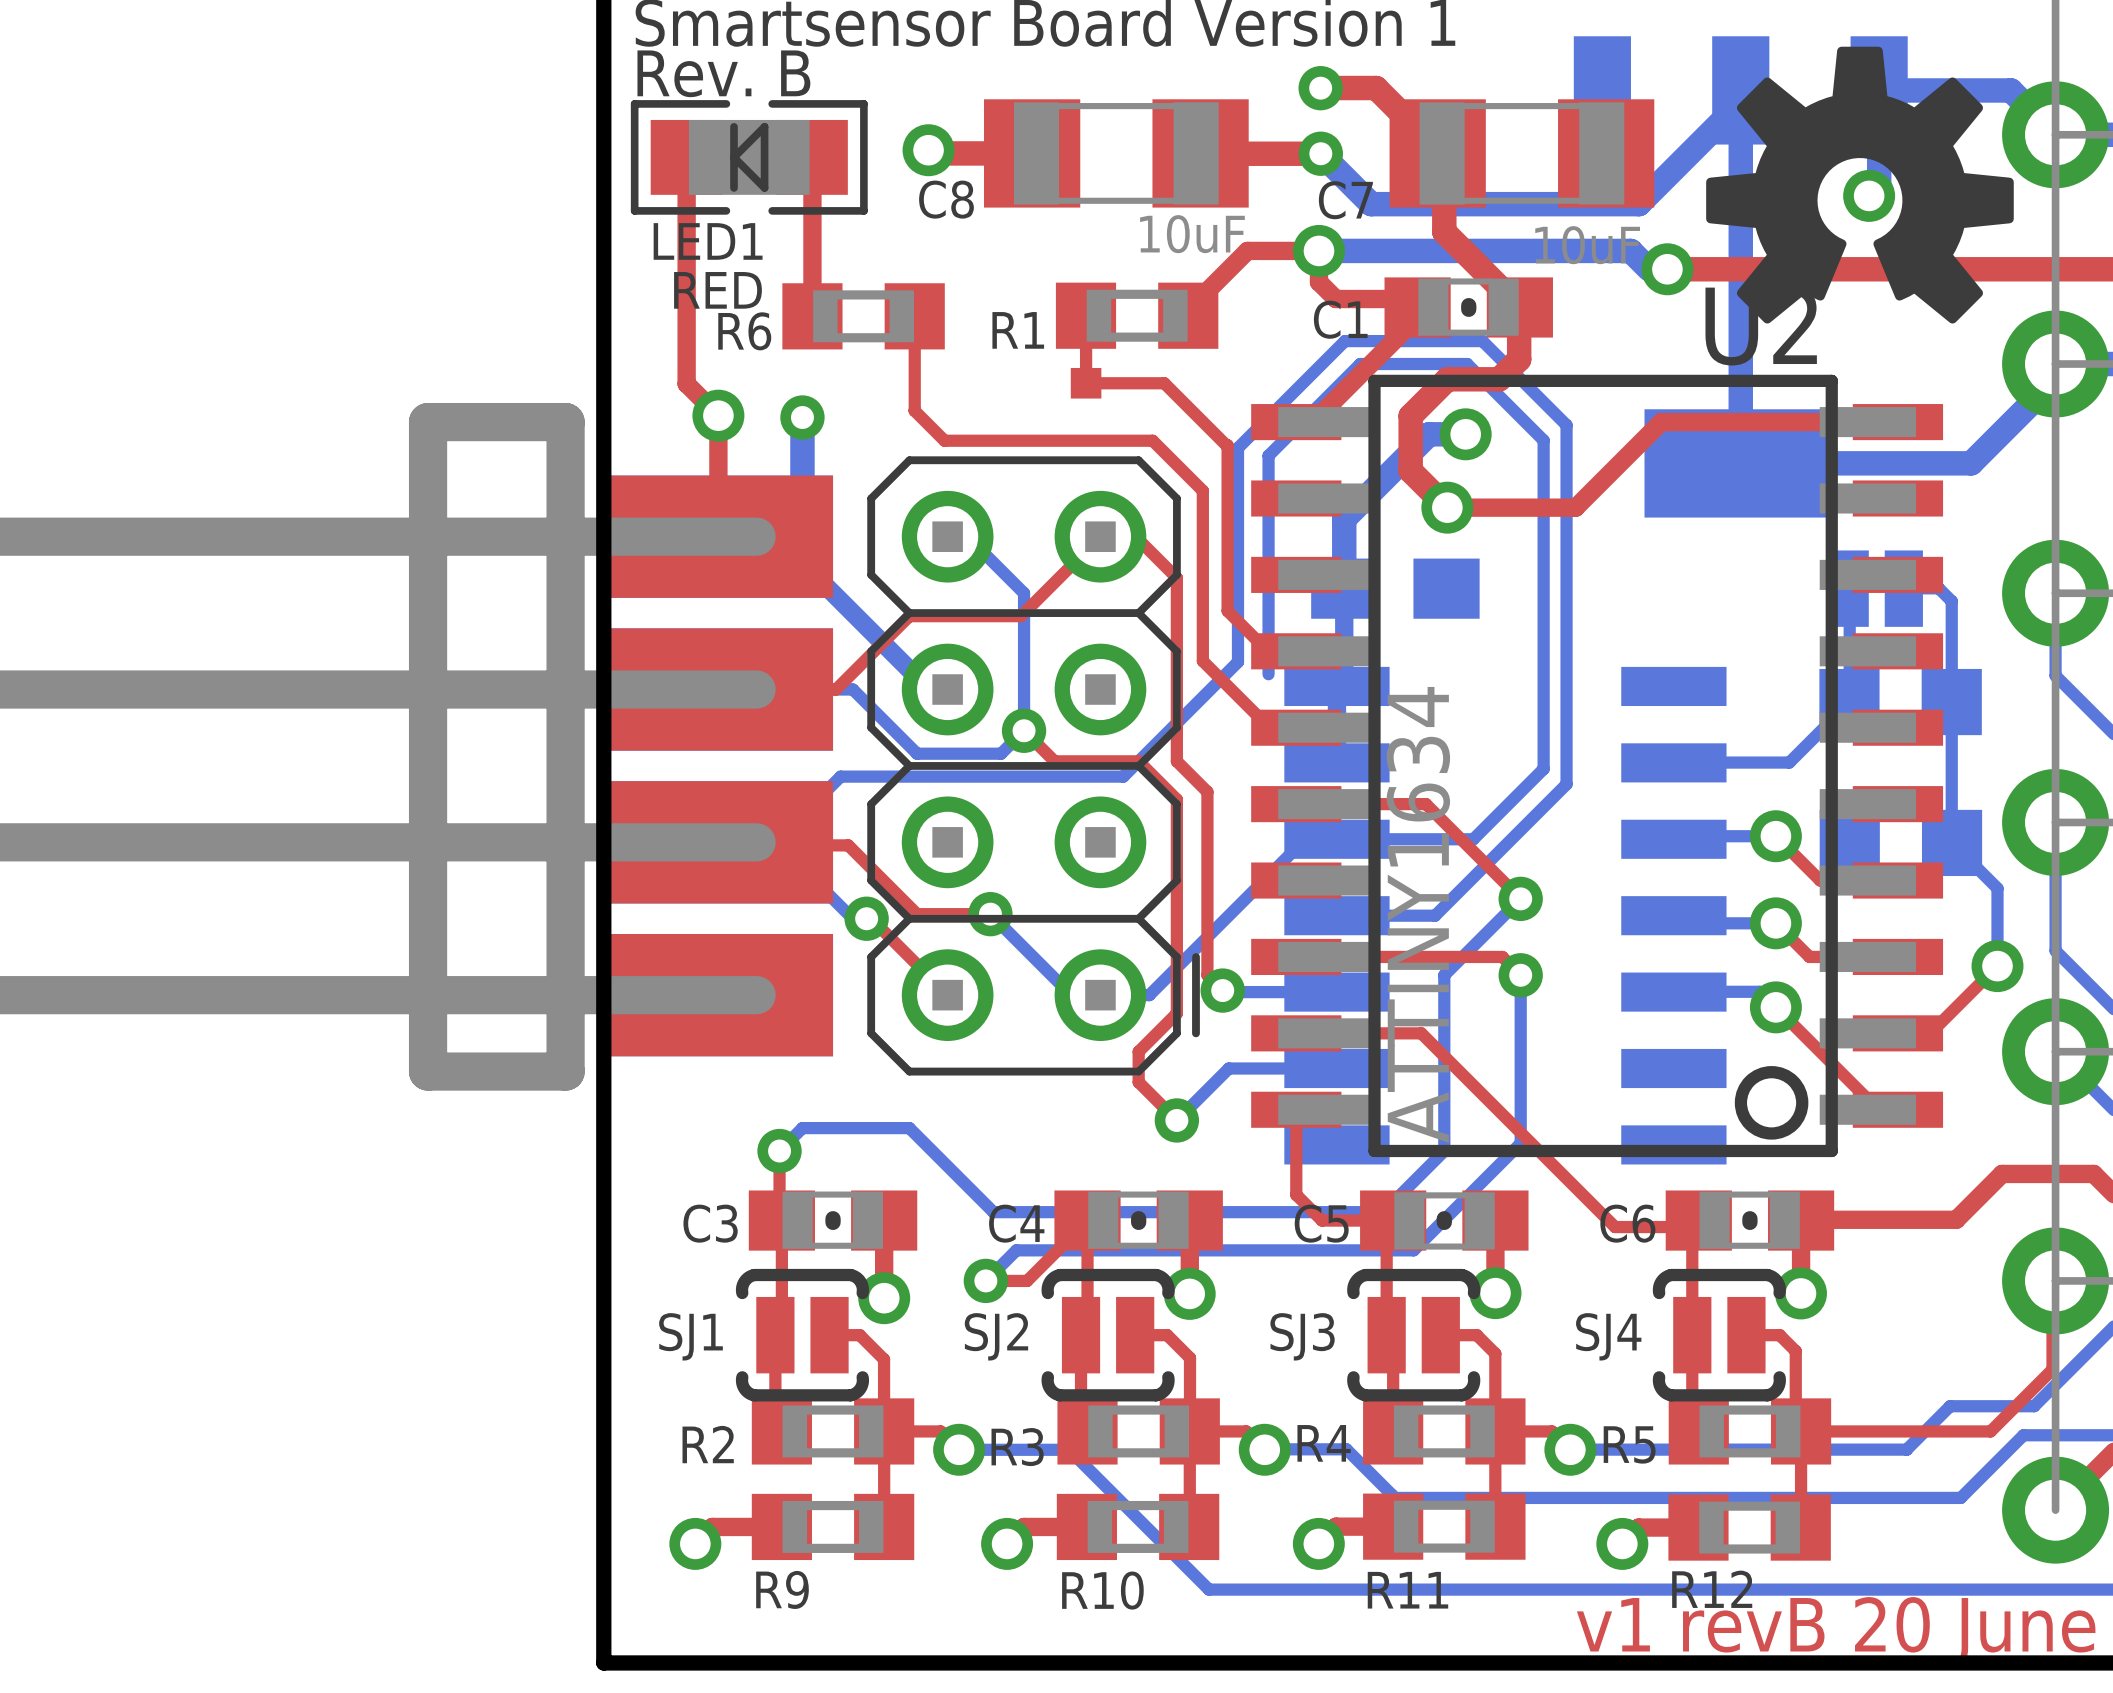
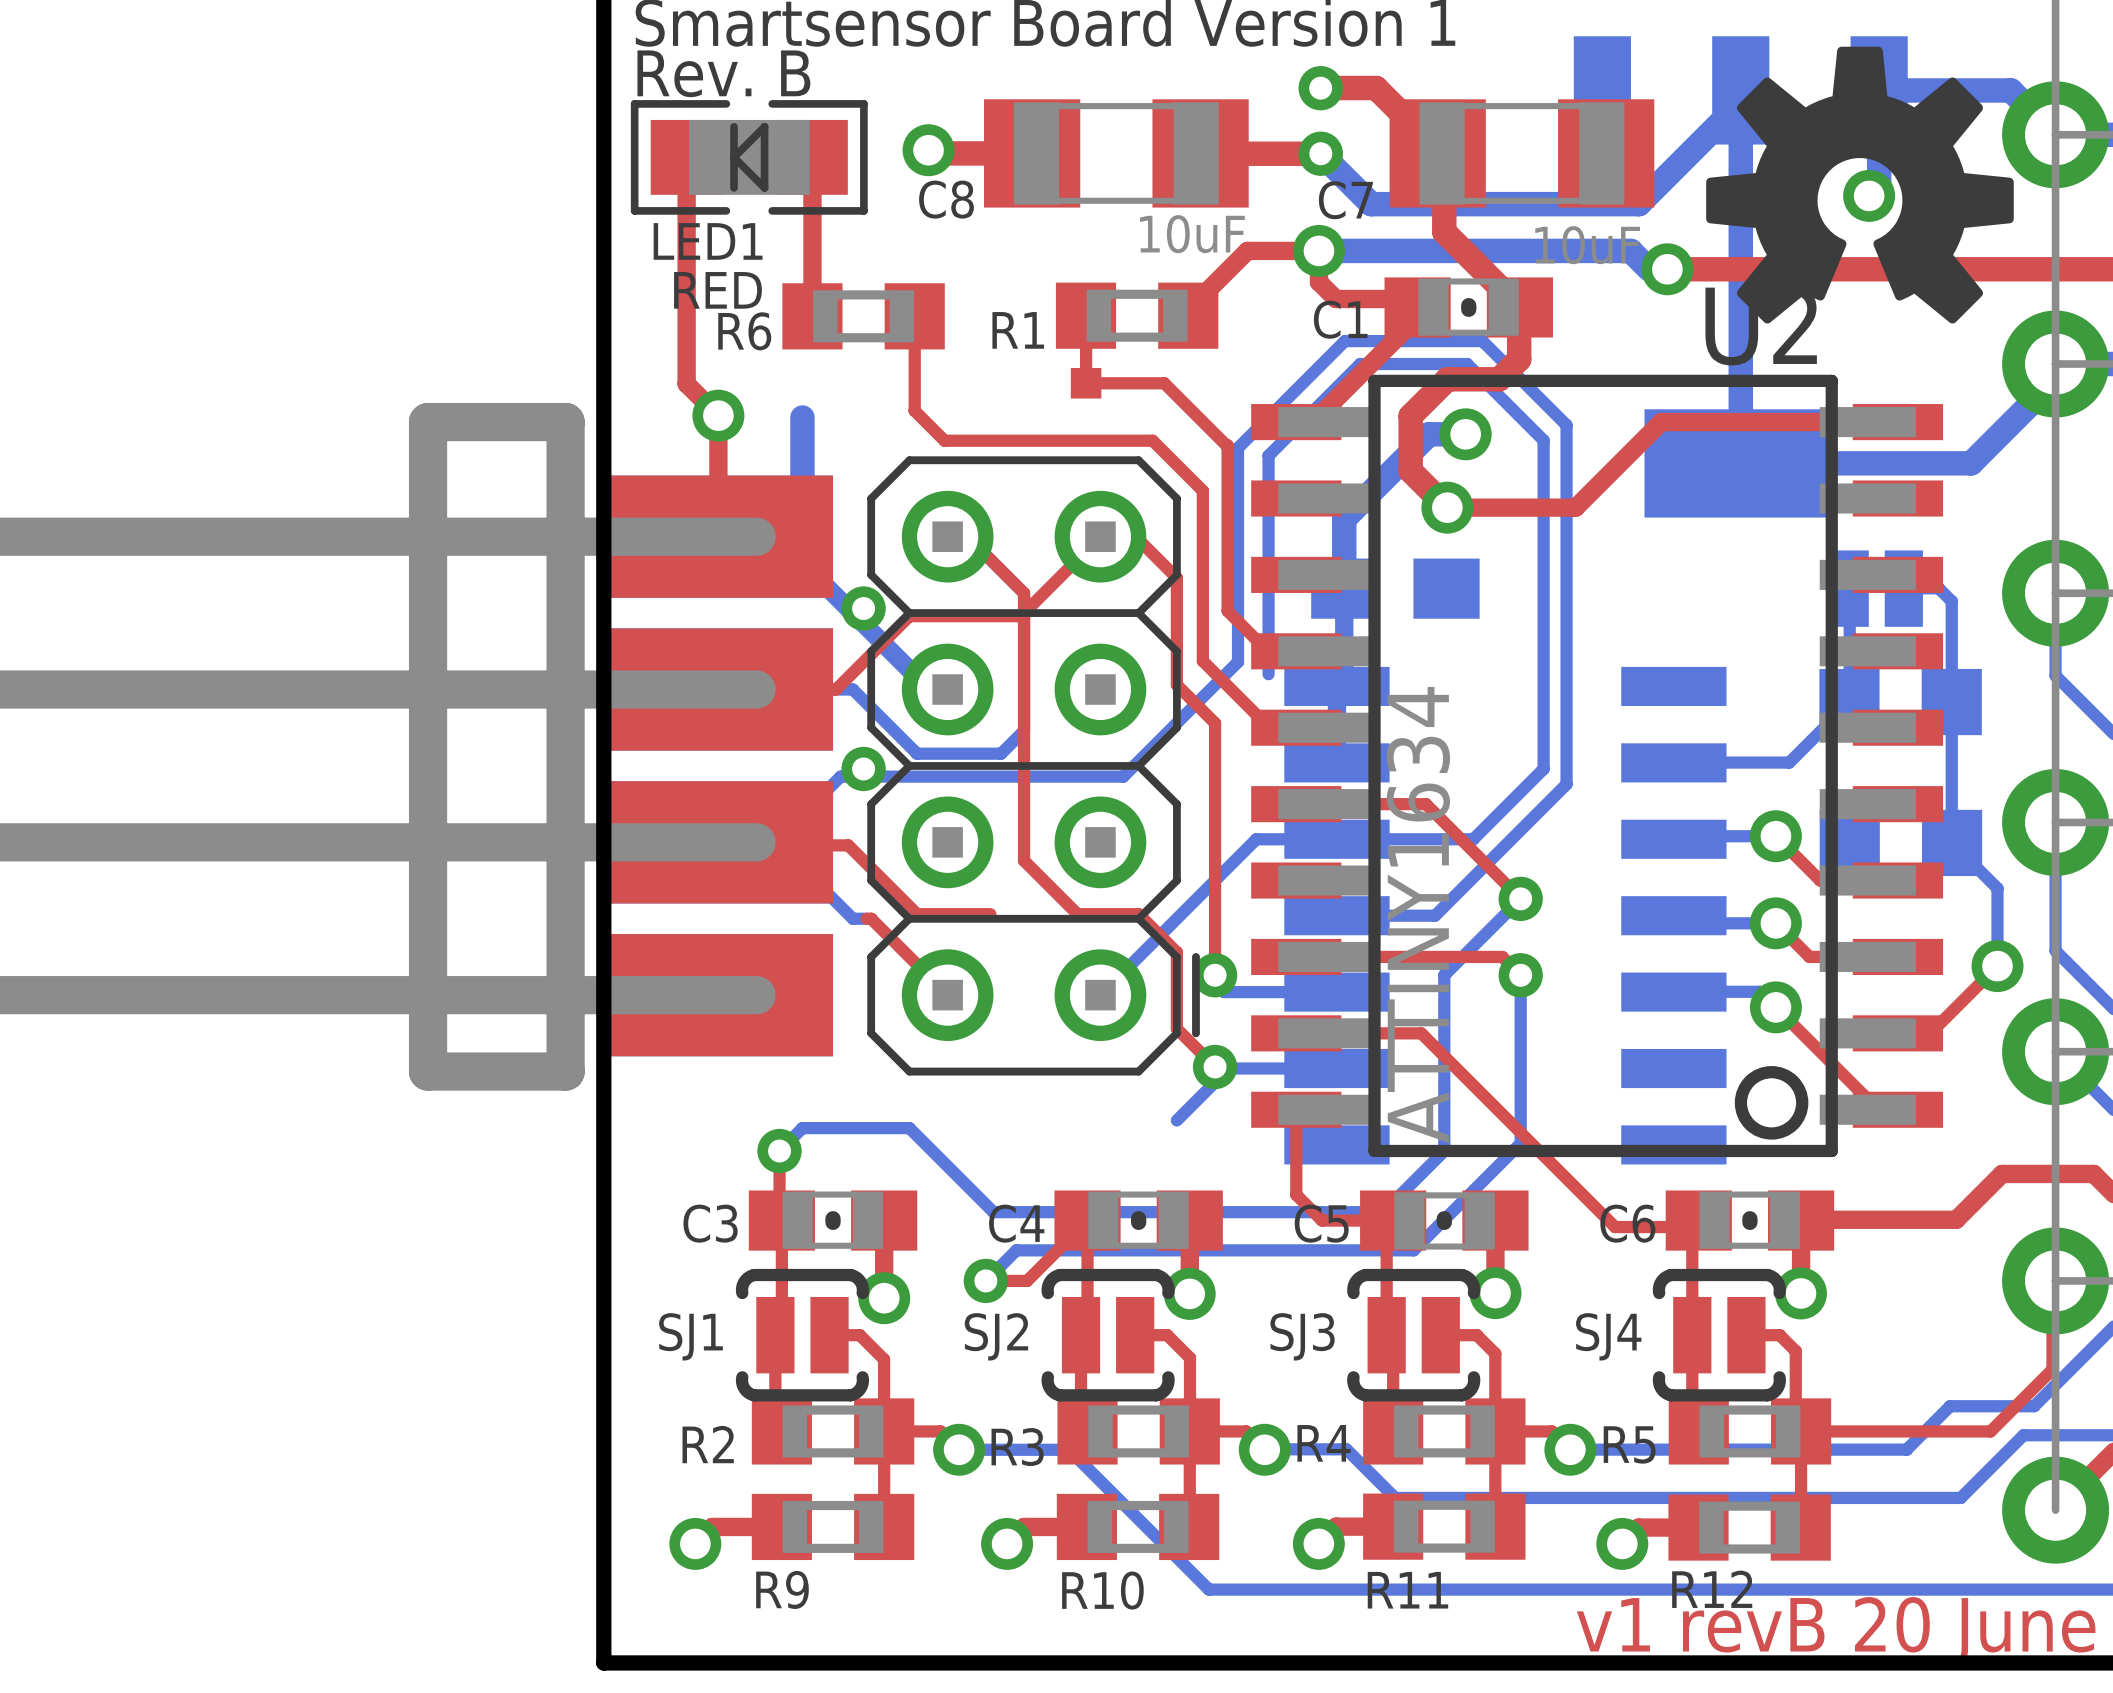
via: (802, 417) -> none
via: none -> (863, 608)
top track: (1176, 684) (1176, 761) (1207, 791) (1207, 975) (1222, 990) -> (1176, 684) (1215, 723) (1215, 975)
top track: (1024, 730) (1054, 761) (1138, 761) (1176, 799) (1176, 952) -> (947, 536) (967, 536) (1024, 593) (1024, 860) (1077, 914) (1138, 914) (1176, 952)
via: (1024, 730) -> none
via: none -> (863, 768)
bottom track: (1336, 839) (1330, 845) (1299, 845) (1149, 995) (1071, 995) (990, 914) -> (1336, 839) (1256, 839) (1100, 995)
via: (990, 914) -> none
via: (866, 918) -> none
via position: (1222, 990) -> (1215, 975)
top track: (1176, 1013) (1138, 1051) (1138, 1082) (1176, 1120) -> (1176, 1013) (1176, 1028) (1215, 1066)
via: none -> (1215, 1066)
via: (1176, 1120) -> none

